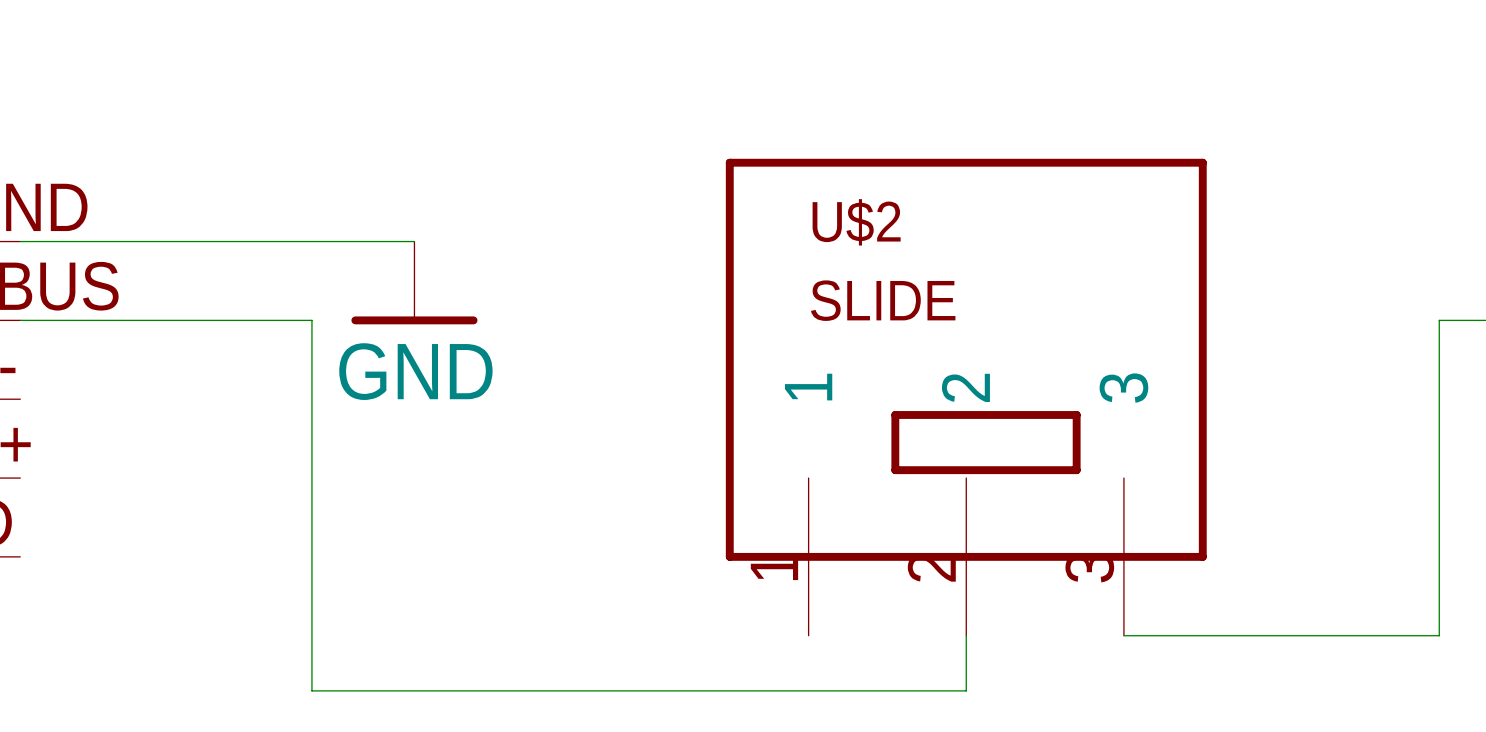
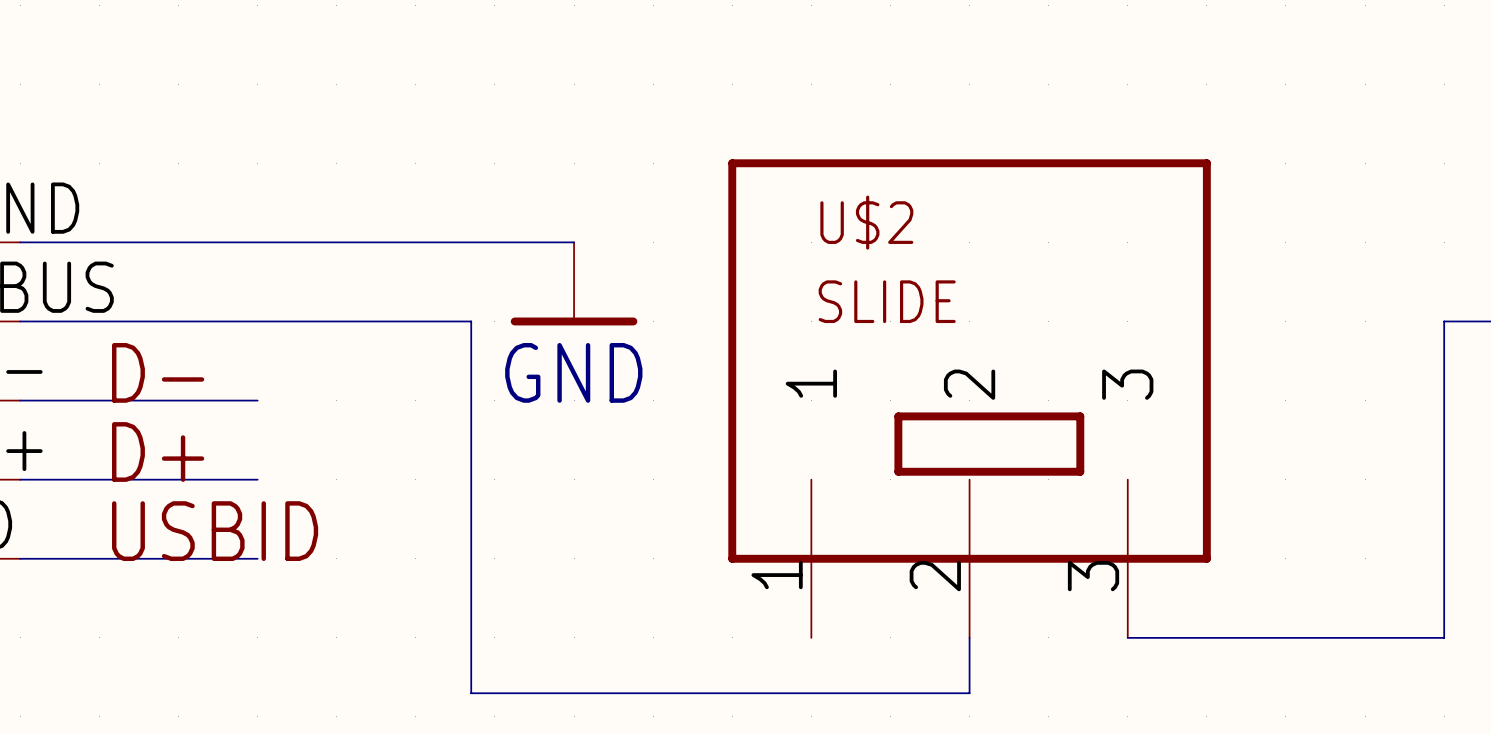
wire: none -> (415, 242) (574, 242)
power symbol position: GND (414, 282) -> GND (574, 283)
wire: (311, 320) (311, 690) (469, 690) -> (313, 321) (471, 321) (471, 693)
label: none -> D- (158, 372)
wire: none -> (20, 400) (257, 400)
label: none -> D+ (158, 451)
wire: none -> (20, 479) (257, 479)
label: none -> USBID (215, 531)
wire: none -> (20, 558) (257, 558)

